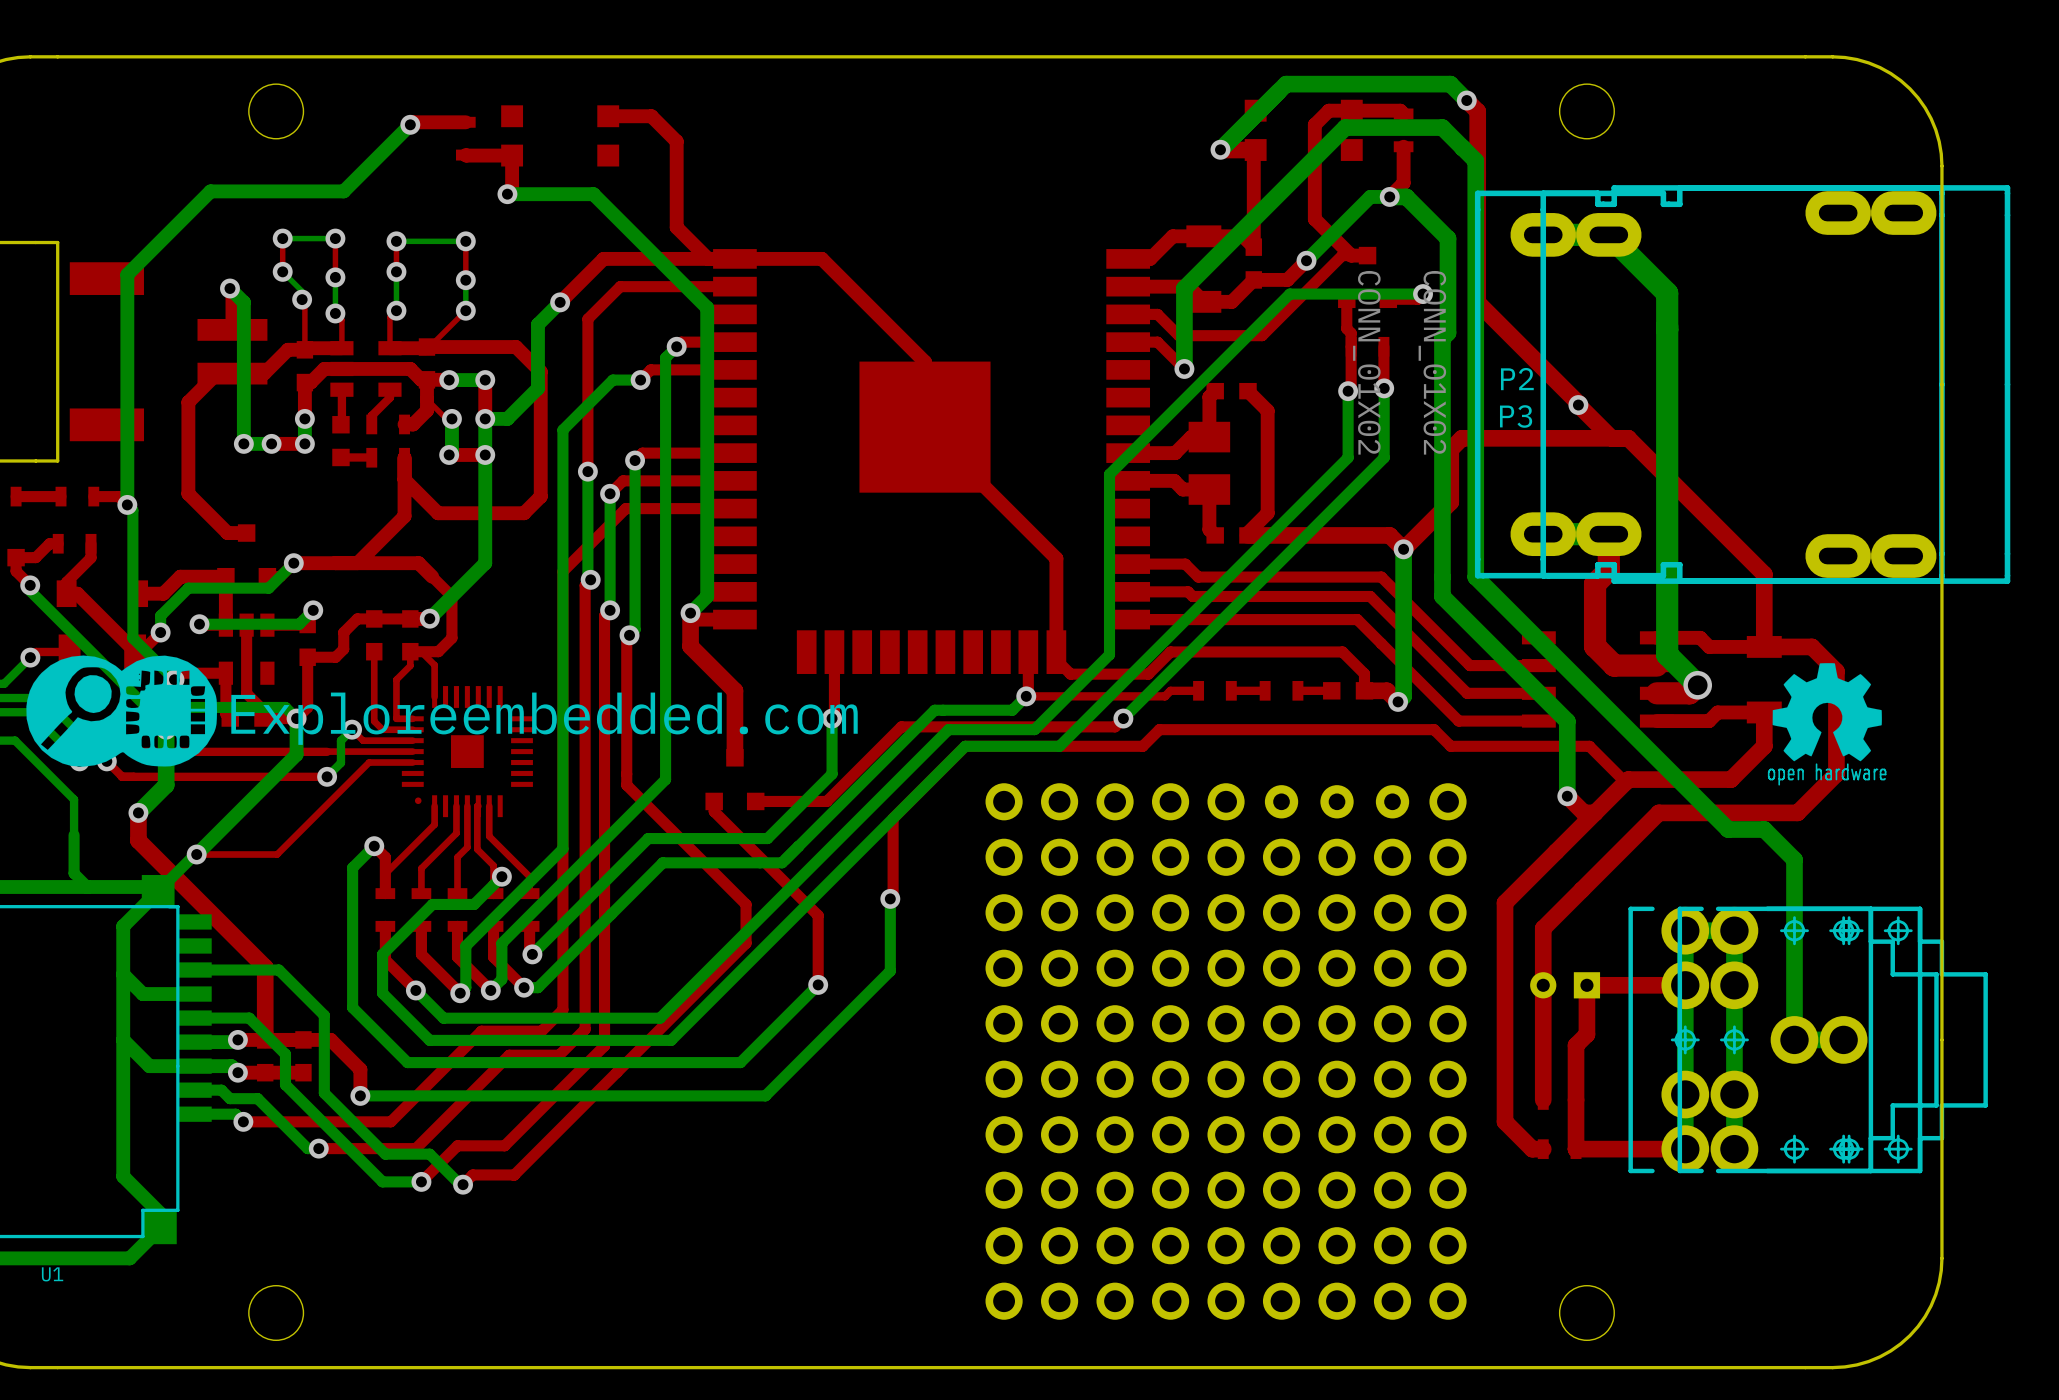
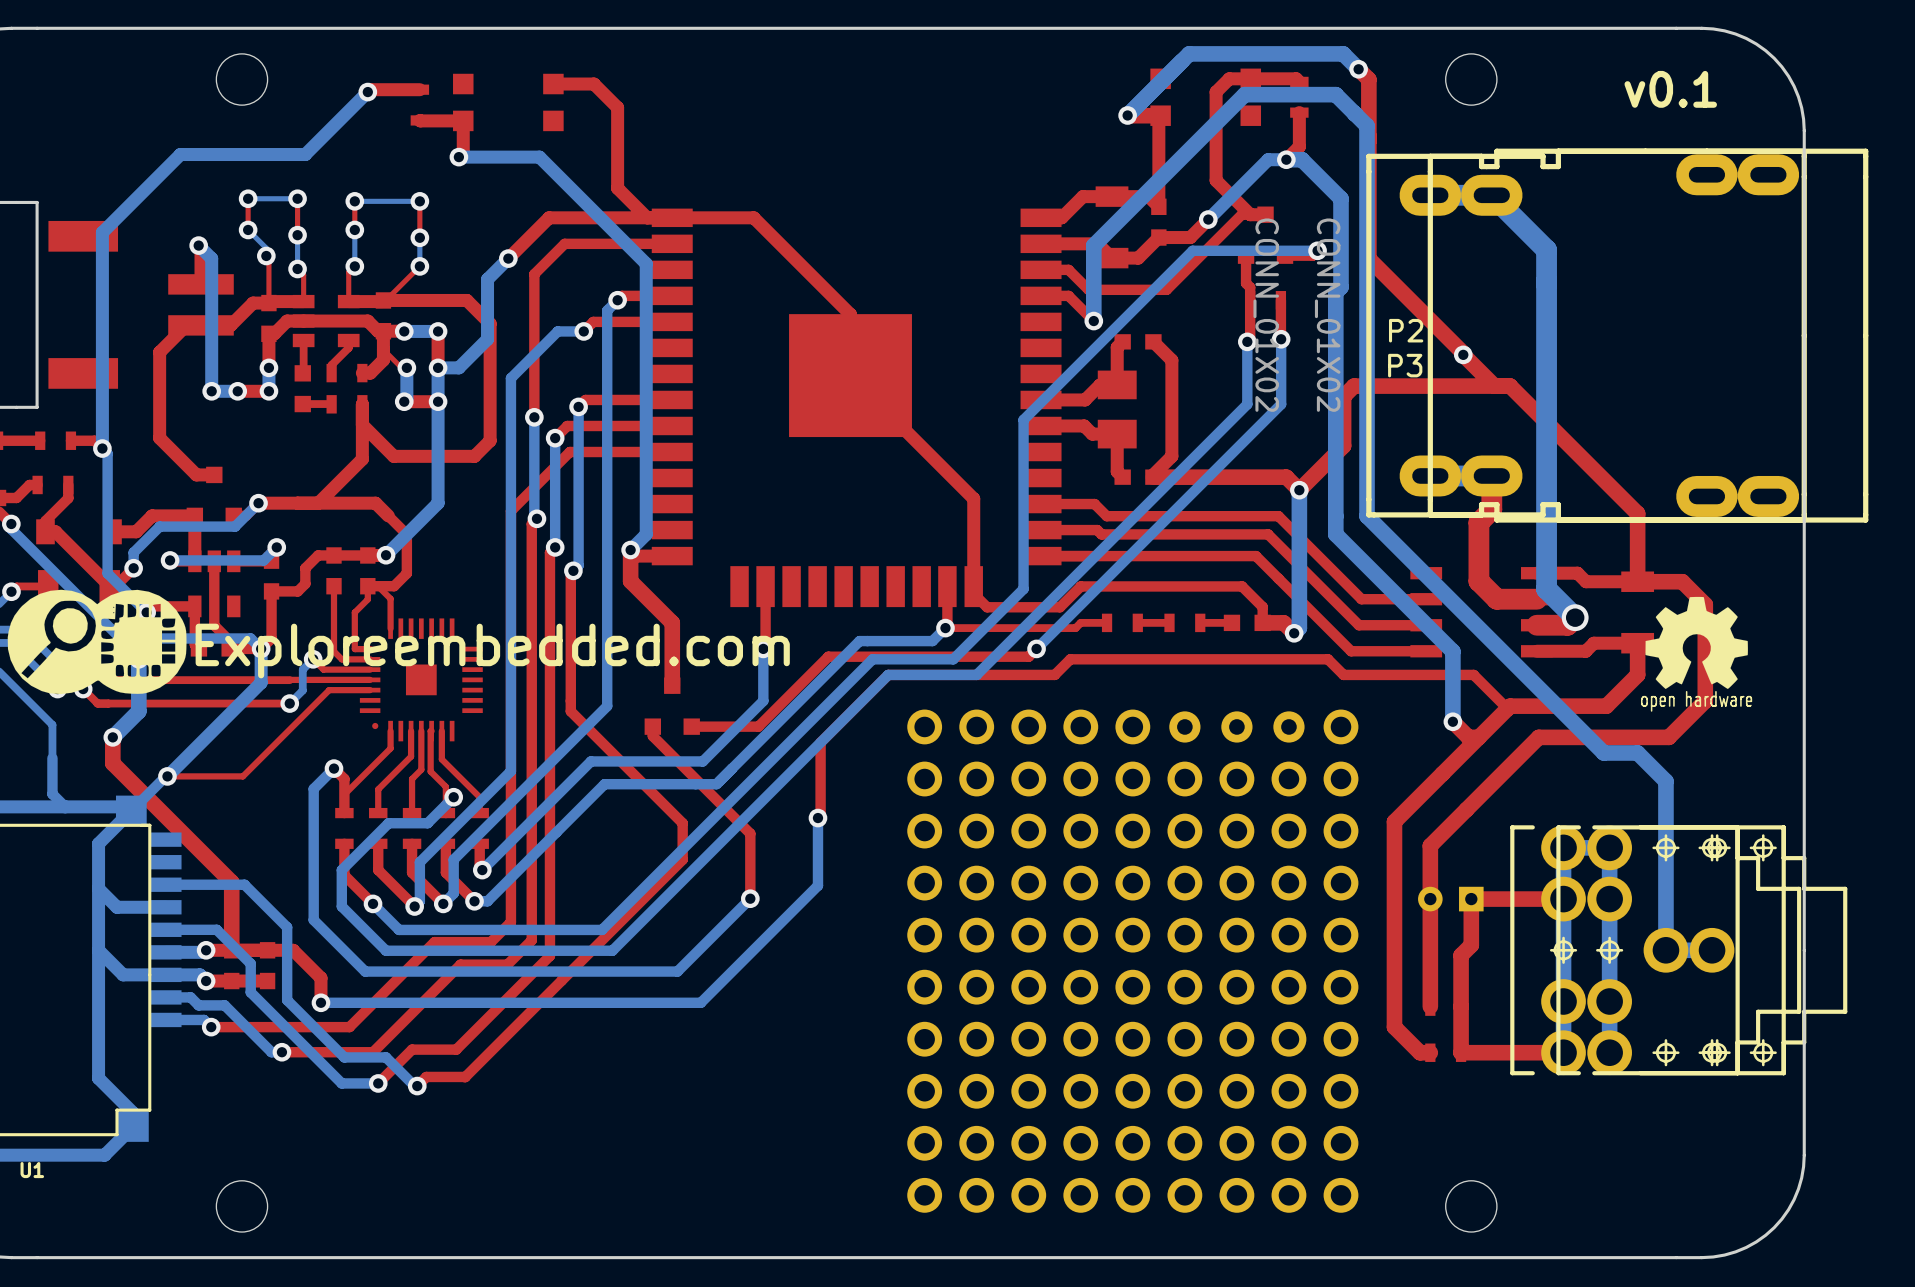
text: none -> v0.1 (1670, 89)

